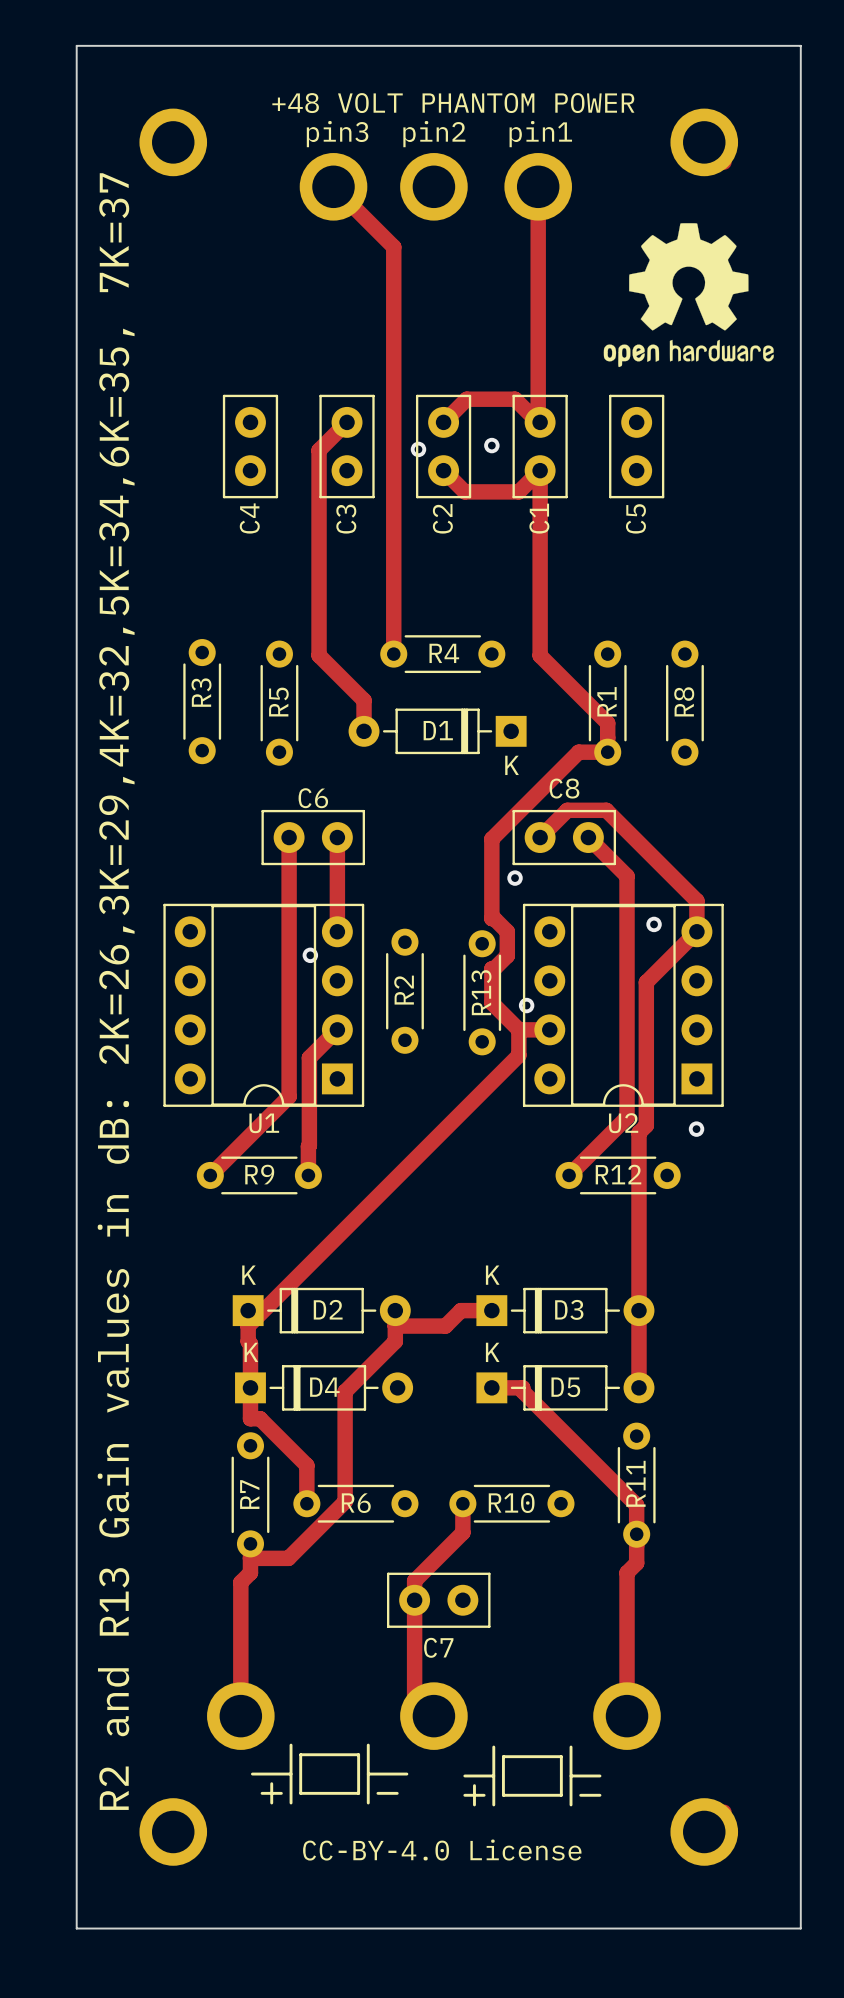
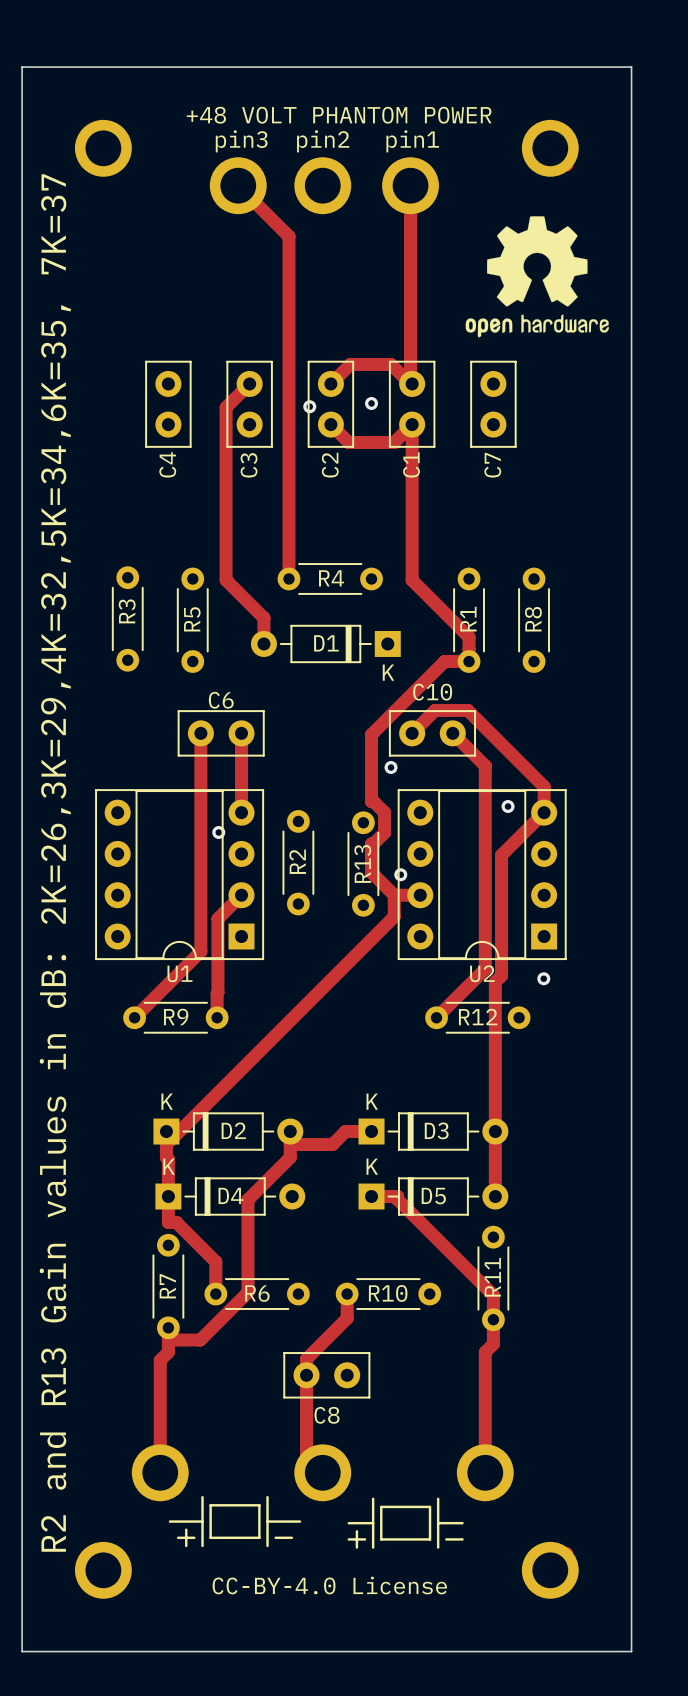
C5 name: C5 (635, 518) -> C7 (492, 465)
C8 name: C8 (564, 788) -> C10 (432, 692)
C7 name: C7 (438, 1647) -> C8 (327, 1415)

